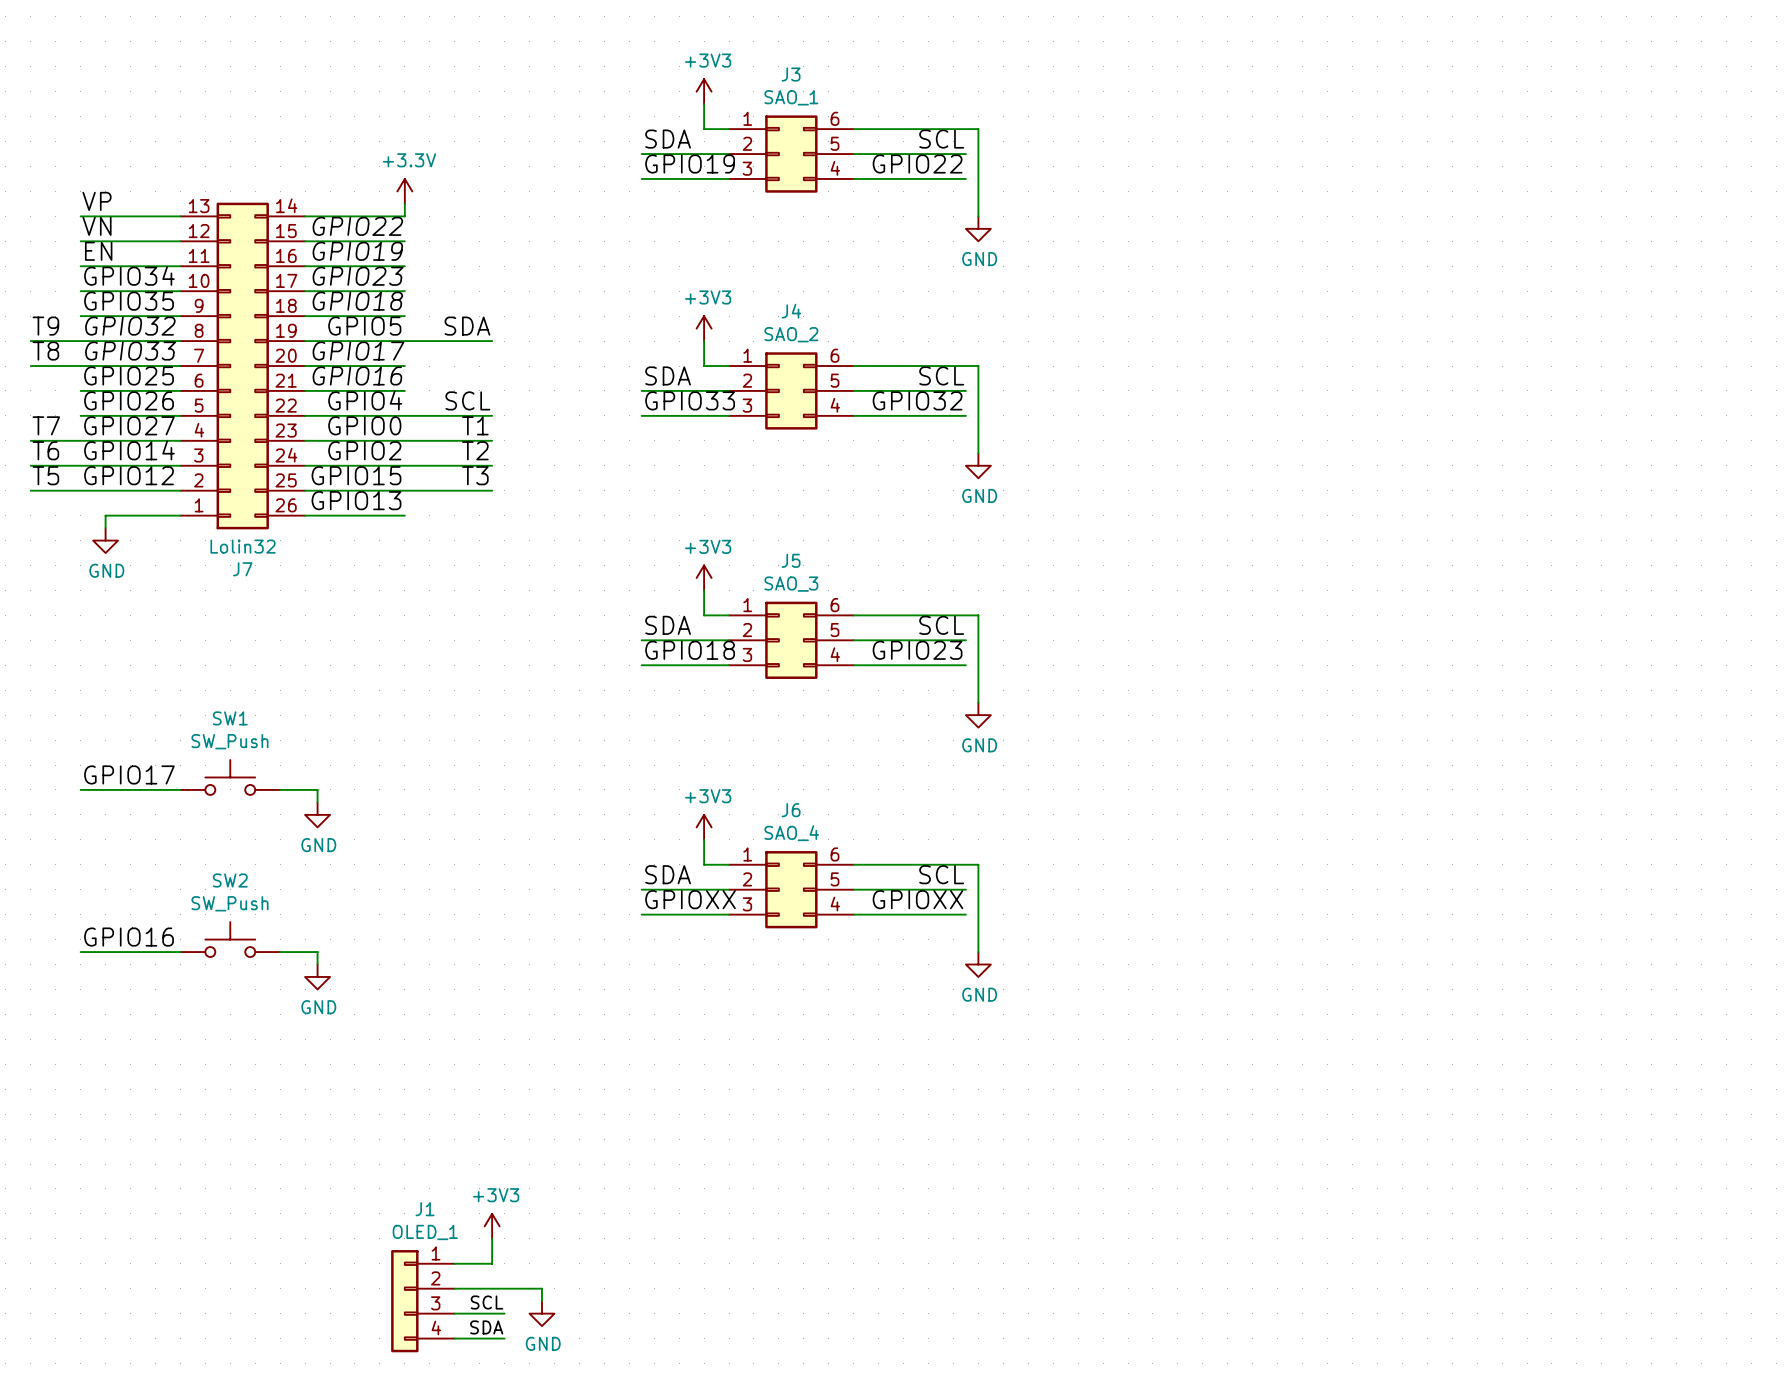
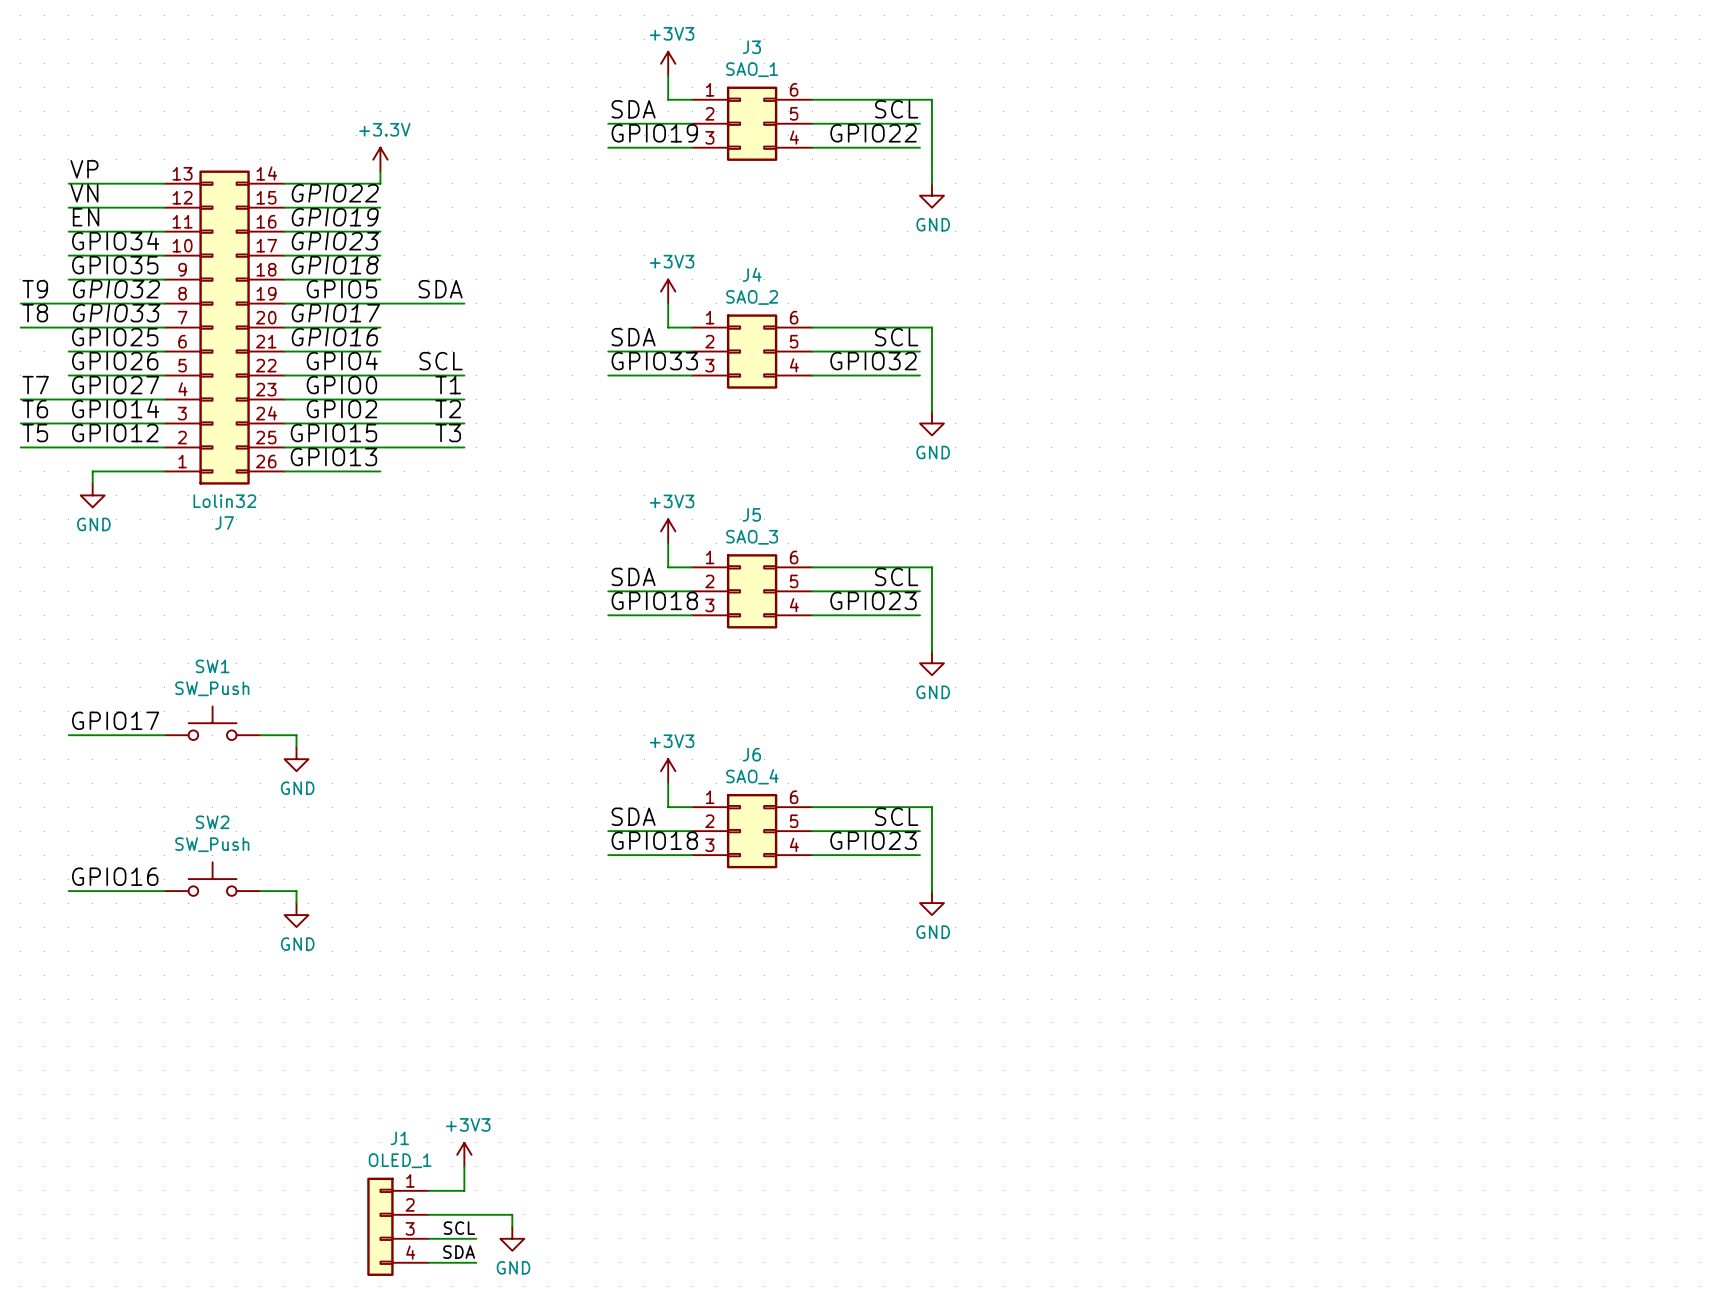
label: GPIOXX (690, 899) -> GPIO18 (654, 840)
label: GPIOXX (917, 899) -> GPIO23 (873, 840)

